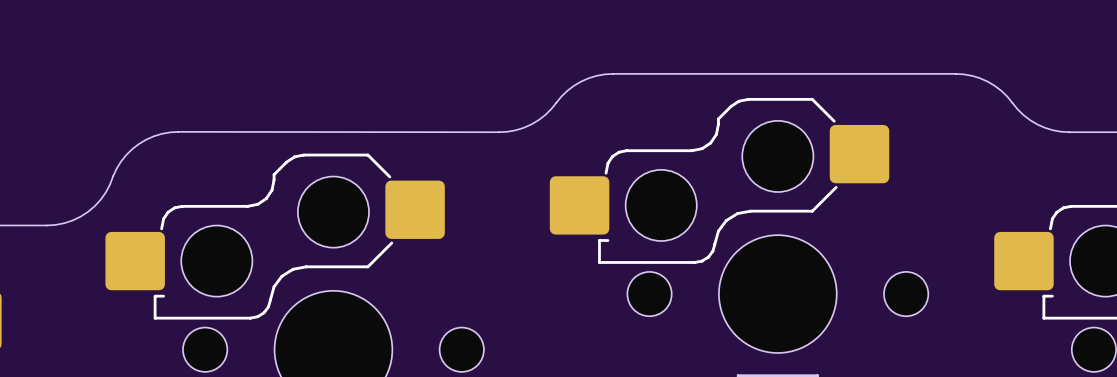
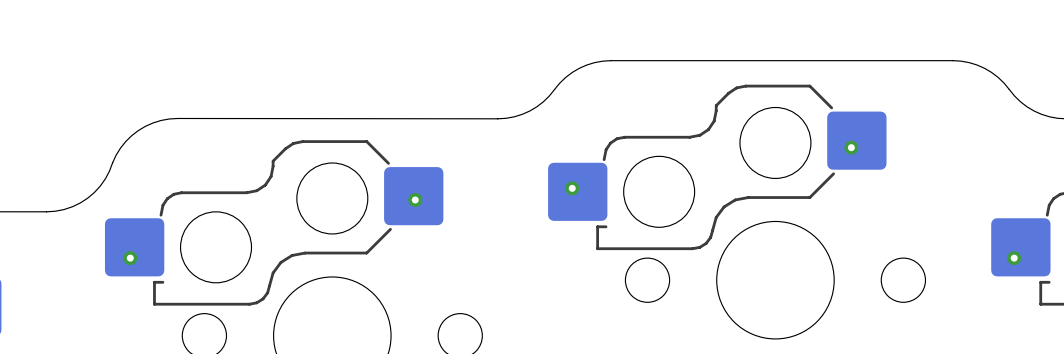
via: none -> (851, 147)
via: none -> (572, 188)
via: none -> (415, 199)
via: none -> (130, 258)
via: none -> (1014, 258)

